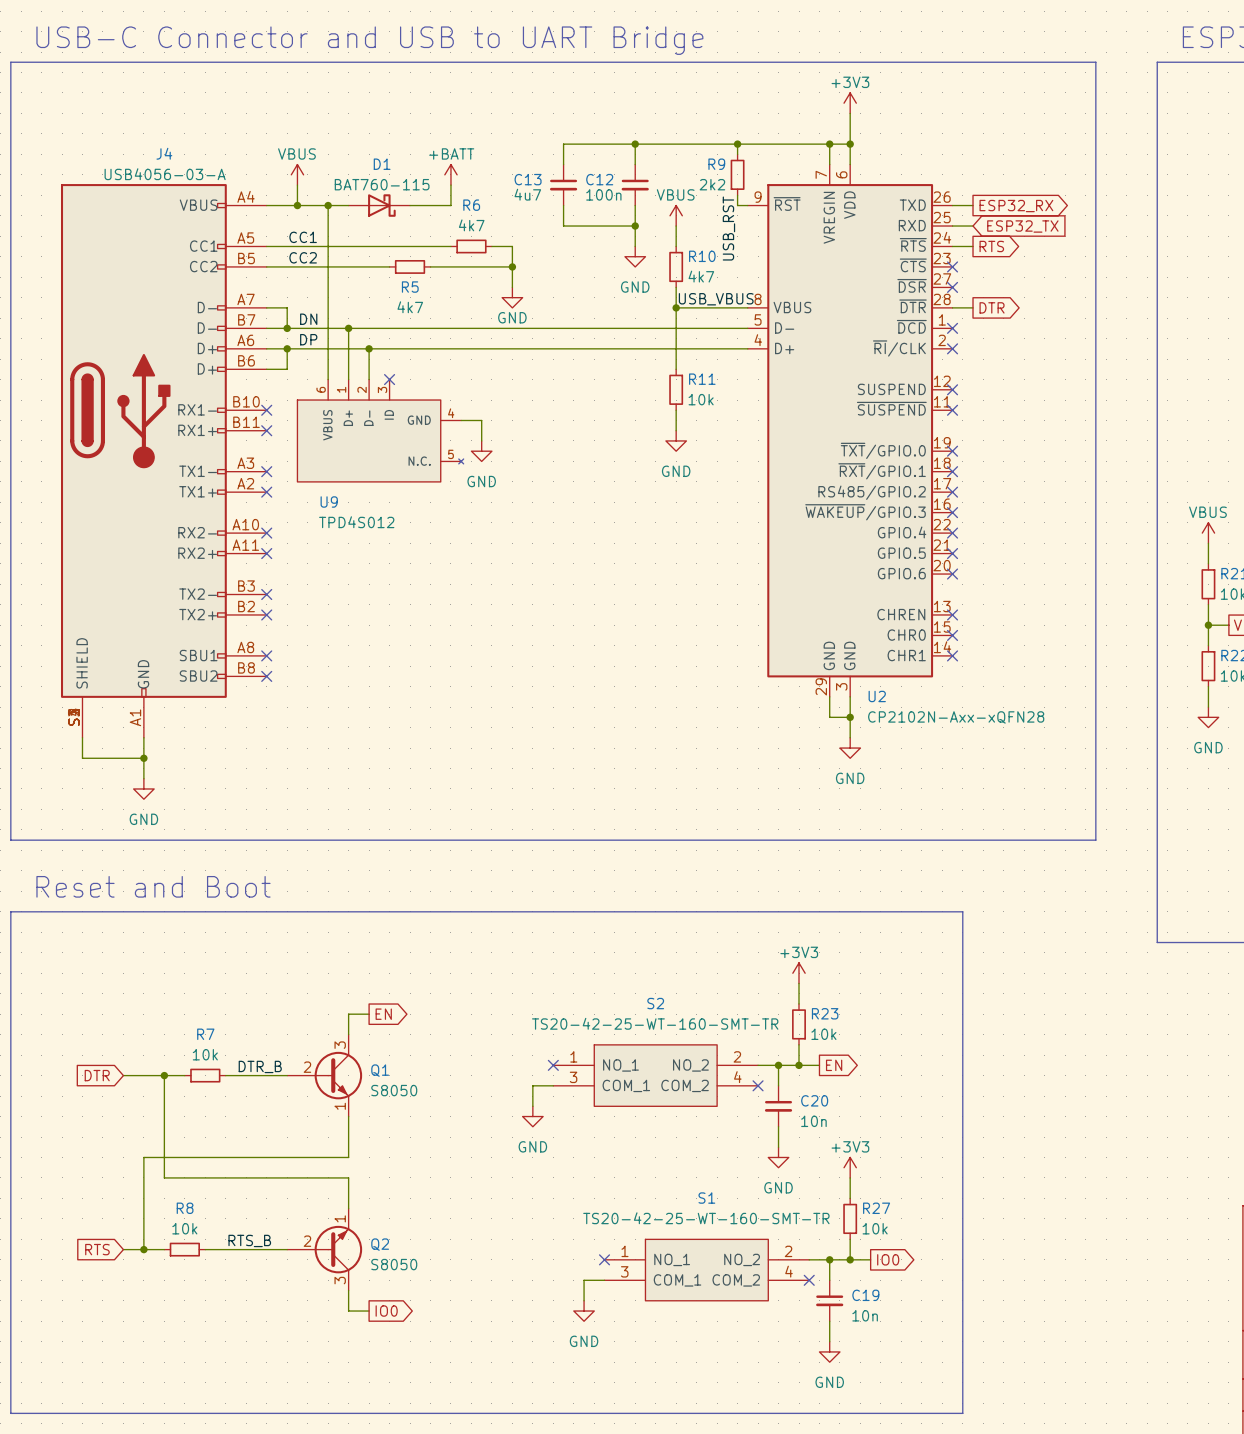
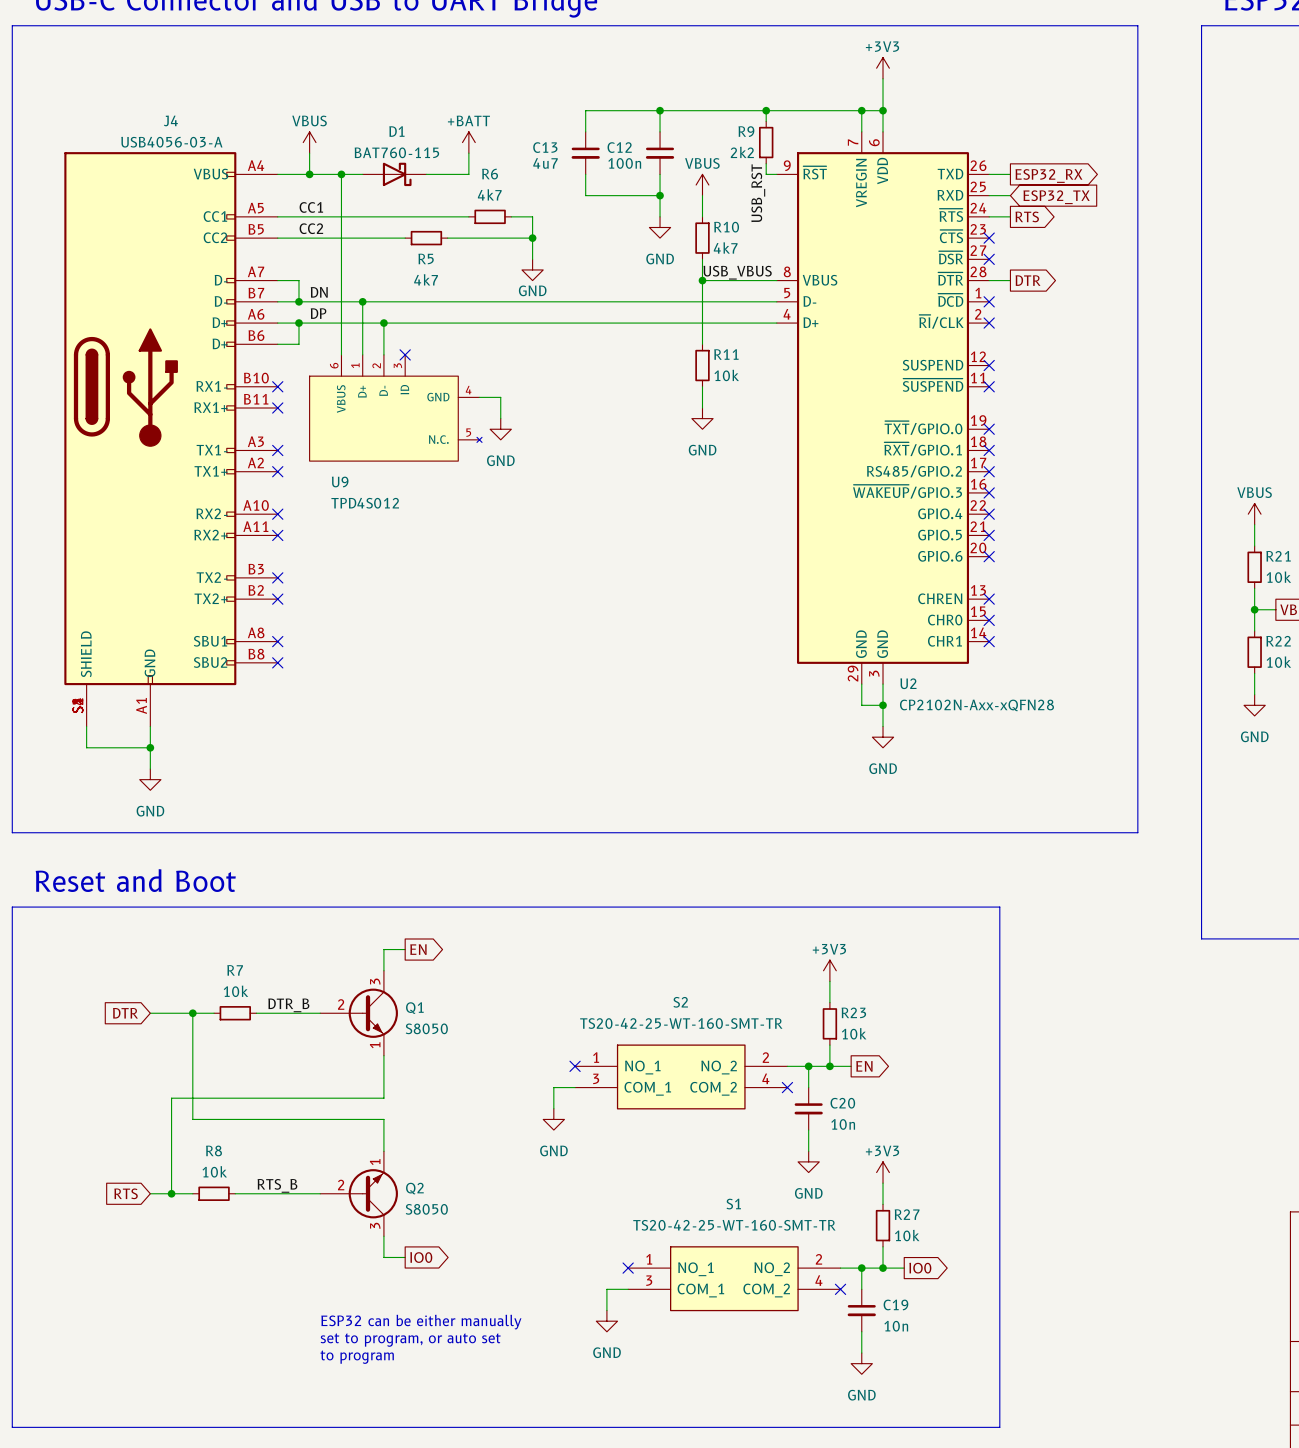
wire: none -> (192, 1013) (192, 1119) (383, 1119) (383, 1151)
junction: none -> (192, 1013)
wire: (369, 1014) (348, 1014) (348, 1034) -> (405, 949) (383, 949) (383, 970)
global label position: EN (383, 1014) -> EN (418, 949)
label position: DTR_B (260, 1066) -> DTR_B (288, 1005)
global label position: DTR (97, 1075) -> DTR (125, 1013)
wire: (123, 1075) (184, 1075) -> (150, 1013) (214, 1013)
wire: (164, 1075) (164, 1096) -> (383, 1055) (383, 1098) (171, 1098)
junction: (164, 1075) -> none
R7 position: (205, 1075) -> (235, 1013)
wire: (225, 1075) (287, 1075) -> (256, 1013) (320, 1013)
Q1 position: (324, 1075) -> (359, 1013)
wire: (348, 1116) (348, 1157) (143, 1157) (143, 1249) -> none
wire: (164, 1177) (348, 1177) (348, 1208) -> (171, 1183) (171, 1193)
junction: none -> (171, 1193)
label position: RTS_B (249, 1240) -> RTS_B (277, 1185)
global label position: RTS (97, 1249) -> RTS (126, 1193)
wire: (123, 1249) (164, 1249) -> (150, 1193) (192, 1193)
junction: (143, 1249) -> none
R8 position: (184, 1249) -> (214, 1193)
wire: (205, 1249) (287, 1249) -> (235, 1193) (320, 1193)
Q2 position: (324, 1249) -> (359, 1193)
wire: (348, 1290) (348, 1311) (369, 1311) -> (383, 1236) (383, 1257) (405, 1257)
global label position: IO0 (386, 1311) -> IO0 (421, 1257)
text: none -> ESP32 can be either manually (421, 1322)
text: none -> set to program, or auto set (410, 1340)
text: none -> to program (357, 1357)

